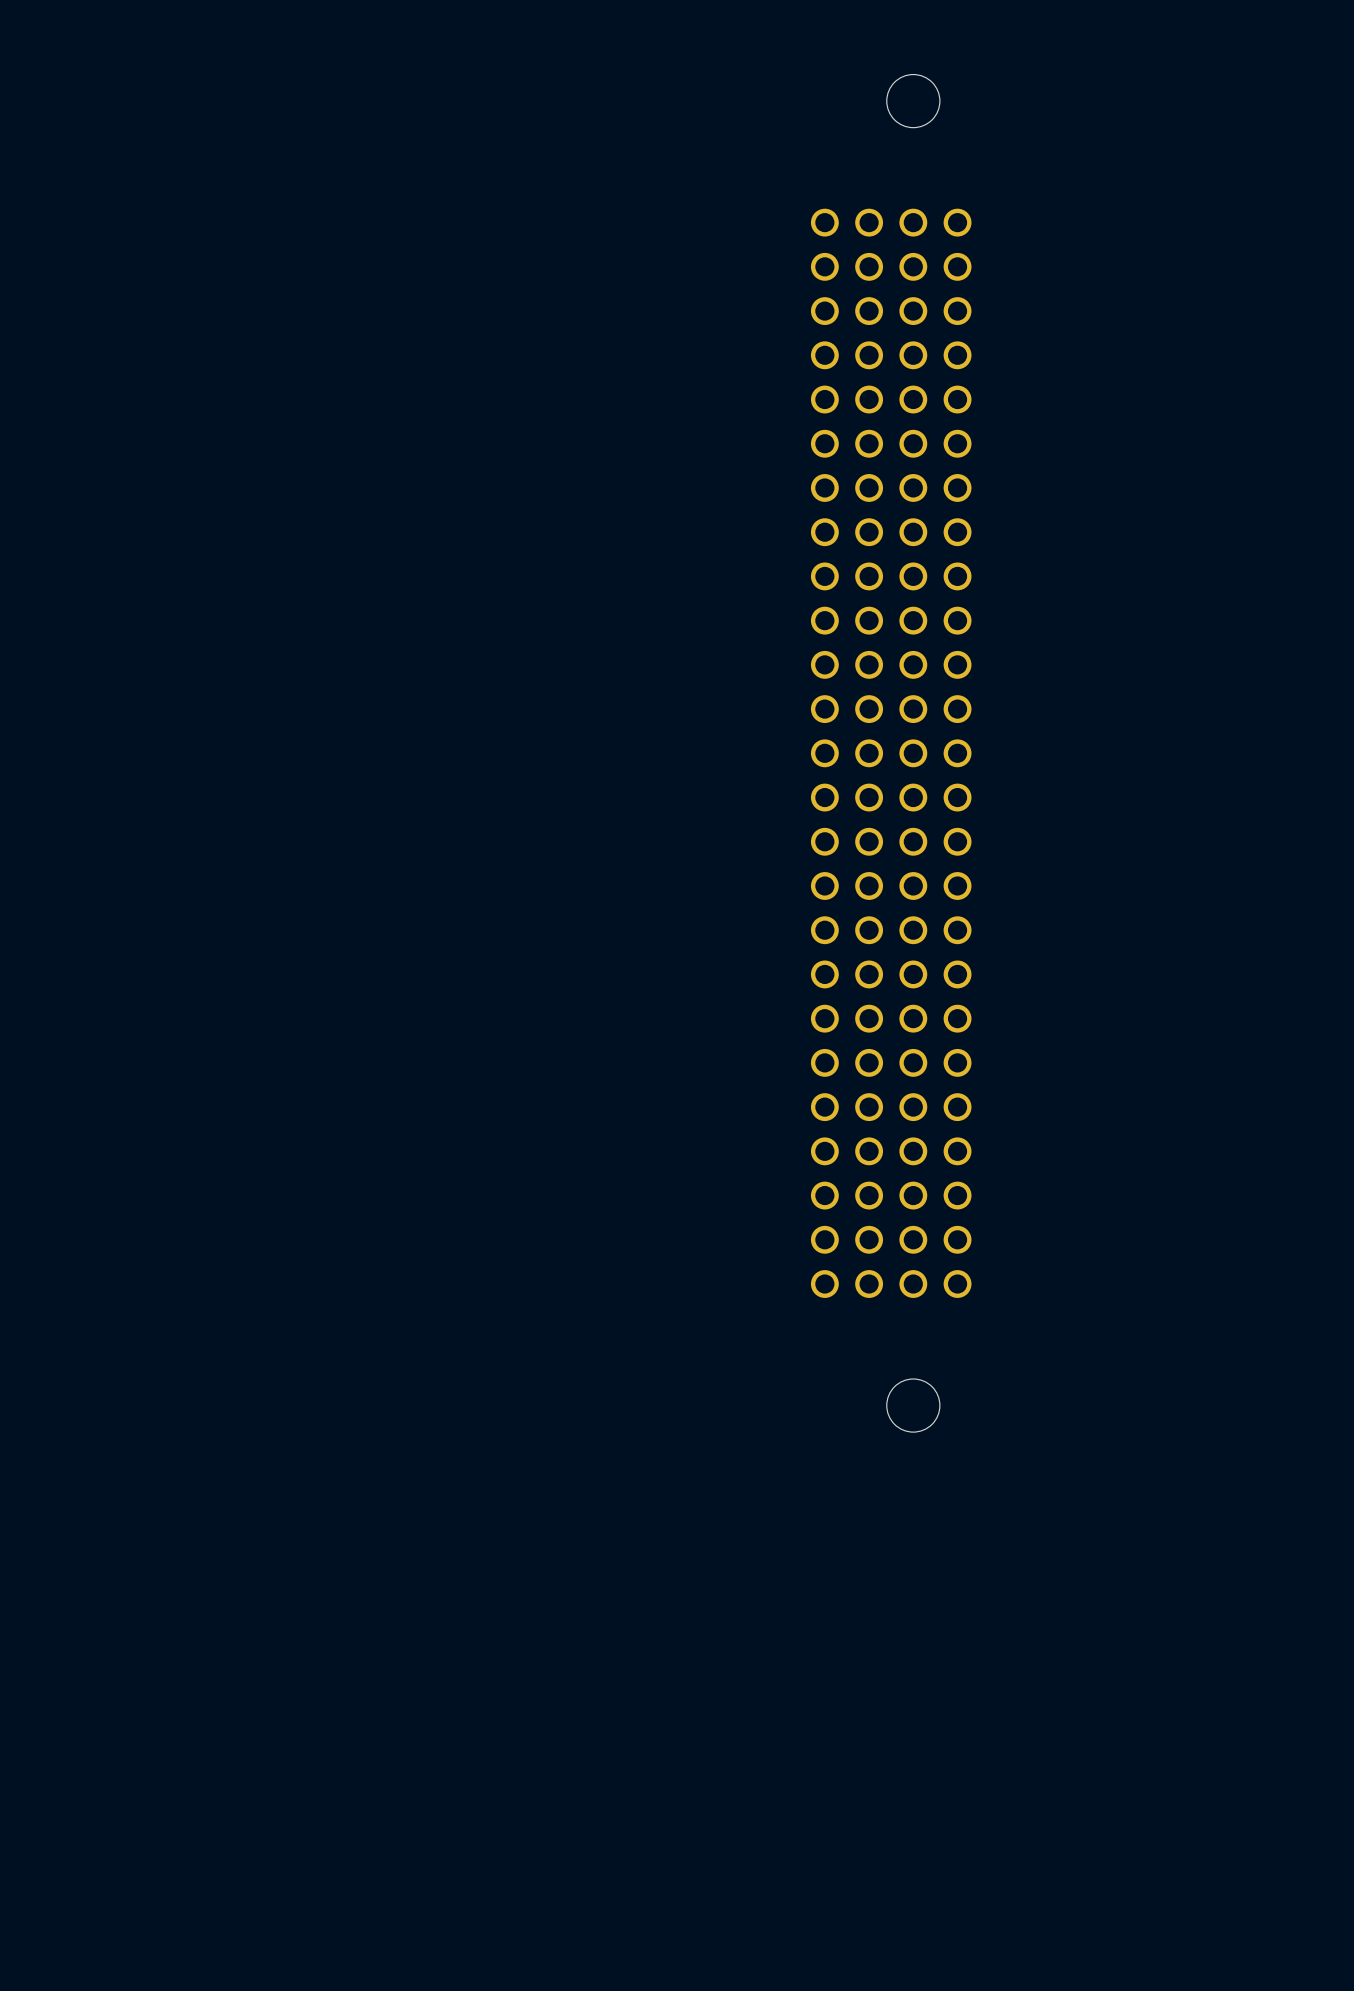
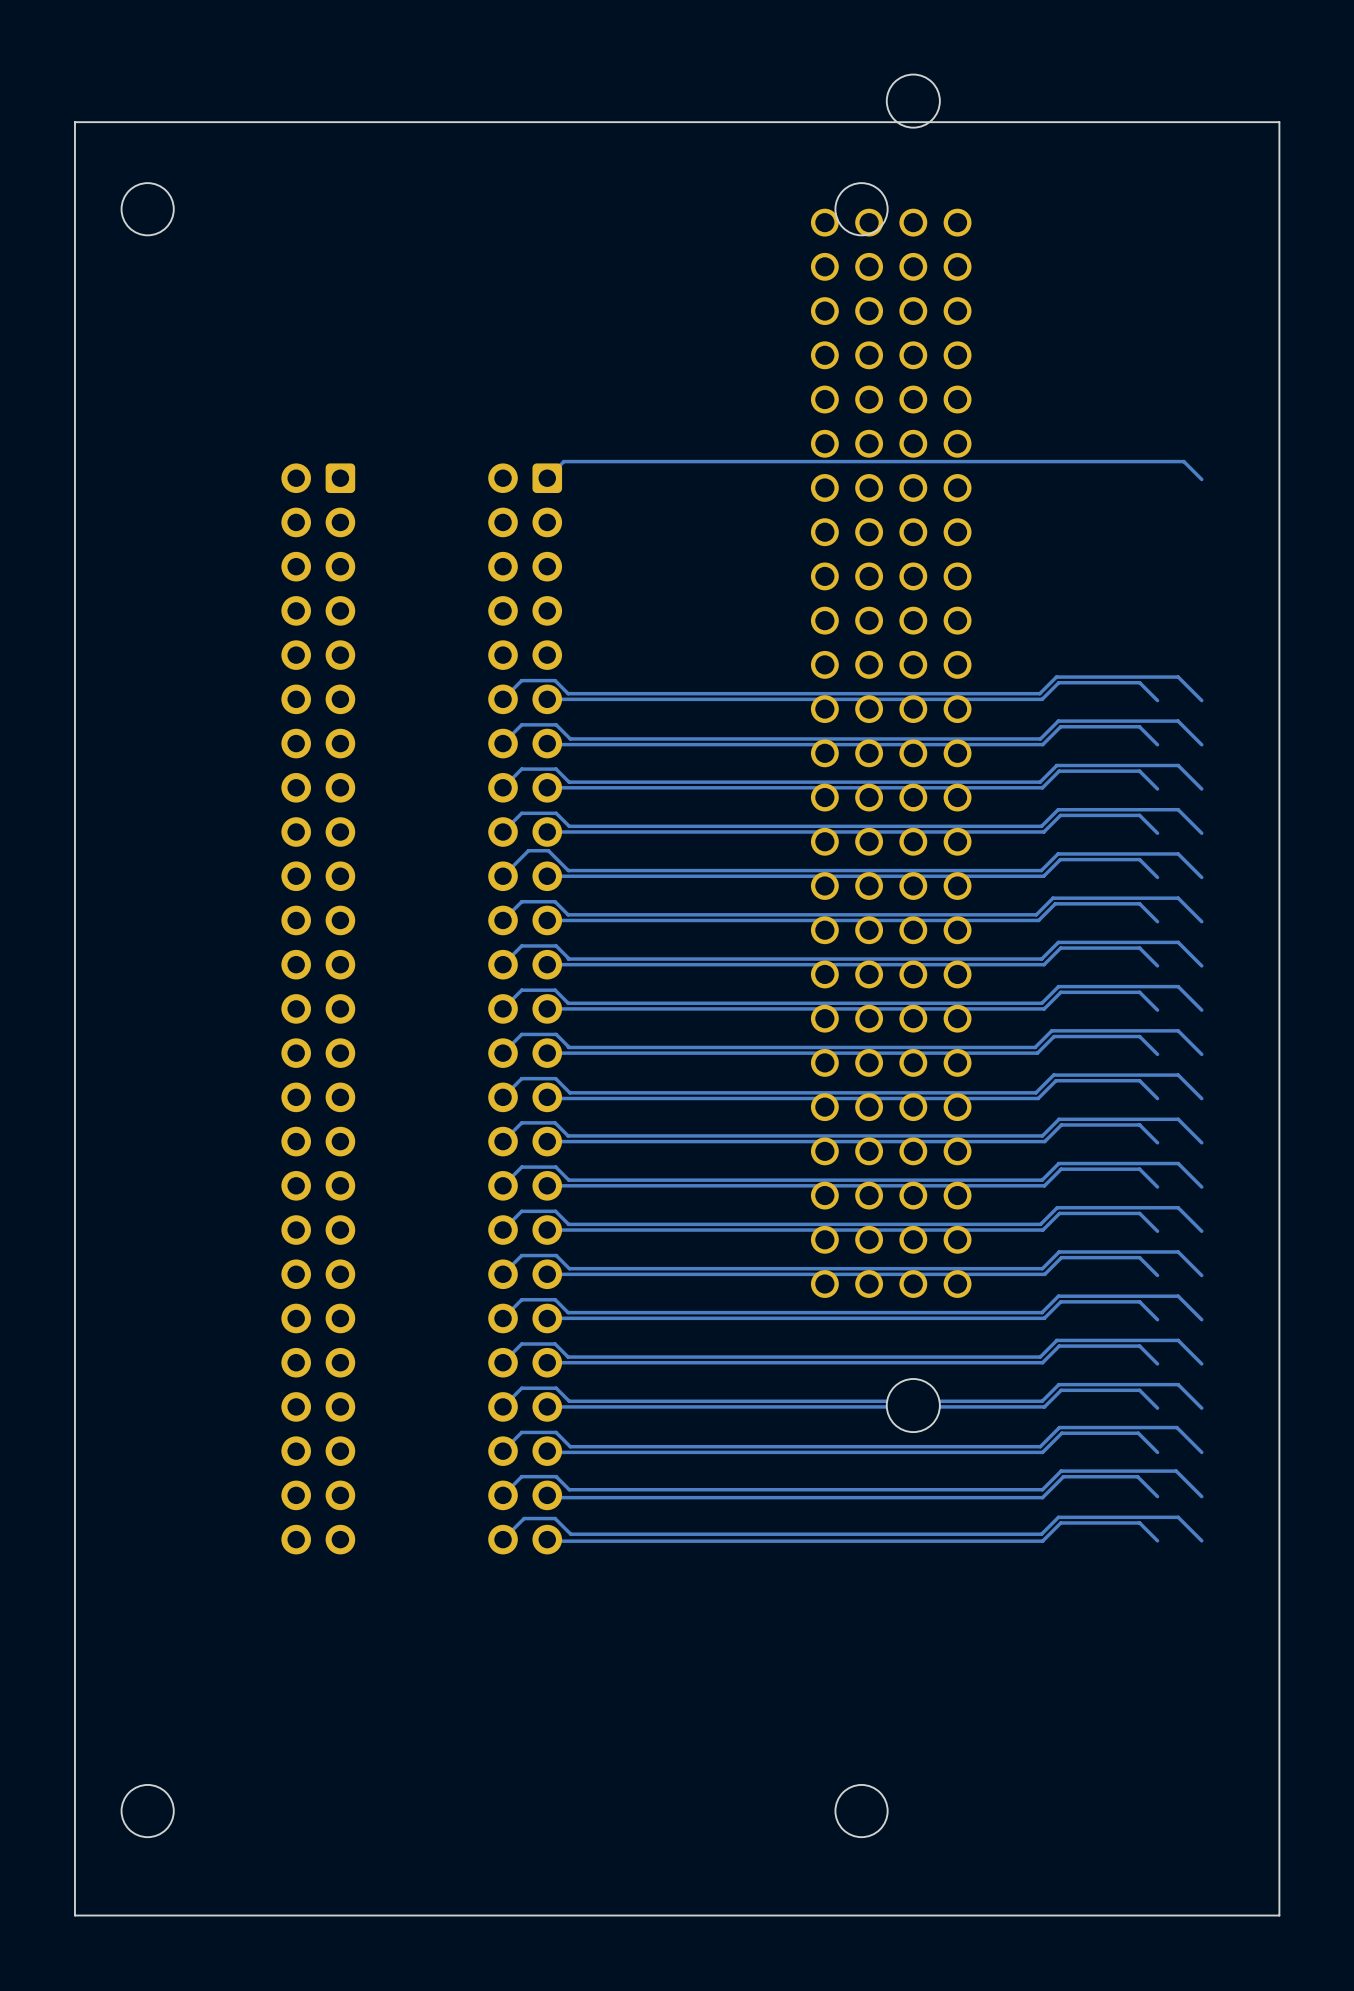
board edge: none -> (1279, 122) (1279, 1915) (74, 1915) (74, 122) (1279, 122)
round board edge: none -> [121, 182, 175, 236]
round board edge: none -> [834, 182, 889, 236]
track: none -> (547, 478) (563, 461) (1183, 461) (1201, 479)
track: none -> (503, 699) (521, 680) (555, 680) (568, 693) (1039, 693) (1056, 677) (1178, 677) (1201, 700)
track: none -> (547, 699) (1042, 699) (1058, 682) (1139, 682) (1157, 700)
track: none -> (503, 743) (521, 724) (556, 724) (570, 738) (1040, 738) (1058, 721) (1178, 721) (1201, 744)
track: none -> (547, 743) (1042, 744) (1060, 726) (1139, 726) (1157, 744)
track: none -> (503, 787) (521, 769) (556, 769) (569, 782) (1040, 782) (1056, 765) (1178, 765) (1201, 789)
track: none -> (547, 787) (1042, 787) (1059, 771) (1139, 771) (1157, 789)
track: none -> (547, 831) (1043, 831) (1060, 815) (1139, 815) (1157, 833)
track: none -> (503, 832) (521, 813) (556, 813) (569, 826) (1041, 826) (1058, 809) (1178, 809) (1201, 833)
track: none -> (503, 876) (528, 850) (548, 850) (568, 870) (1041, 870) (1058, 853) (1178, 853) (1201, 877)
track: none -> (547, 876) (1043, 876) (1060, 859) (1139, 859) (1157, 877)
track: none -> (503, 920) (521, 901) (555, 901) (568, 914) (1036, 914) (1052, 898) (1178, 898) (1201, 921)
track: none -> (547, 920) (1038, 920) (1055, 903) (1139, 903) (1157, 921)
track: none -> (503, 964) (521, 945) (556, 945) (568, 959) (1041, 959) (1058, 942) (1178, 942) (1201, 965)
track: none -> (547, 964) (1044, 964) (1060, 948) (1139, 948) (1157, 965)
part: none -> (318, 1008)
track: none -> (503, 1008) (521, 990) (555, 990) (568, 1003) (1041, 1003) (1058, 986) (1178, 986) (1201, 1010)
part: none -> (525, 1008)
track: none -> (547, 1008) (1044, 1008) (1060, 992) (1139, 992) (1157, 1010)
track: none -> (503, 1053) (521, 1034) (556, 1034) (568, 1047) (1035, 1047) (1051, 1030) (1178, 1030) (1201, 1054)
track: none -> (547, 1053) (1037, 1053) (1054, 1036) (1139, 1036) (1157, 1054)
track: none -> (503, 1097) (521, 1078) (555, 1078) (569, 1092) (1035, 1092) (1053, 1075) (1178, 1075) (1201, 1098)
track: none -> (547, 1097) (1038, 1098) (1056, 1080) (1139, 1080) (1157, 1098)
track: none -> (503, 1141) (521, 1122) (555, 1122) (568, 1135) (1042, 1135) (1059, 1119) (1178, 1119) (1201, 1142)
track: none -> (547, 1141) (1044, 1141) (1061, 1124) (1139, 1124) (1157, 1142)
track: none -> (503, 1185) (521, 1167) (555, 1167) (568, 1180) (1042, 1180) (1058, 1163) (1178, 1163) (1201, 1187)
track: none -> (547, 1185) (1044, 1185) (1061, 1169) (1139, 1169) (1157, 1187)
track: none -> (503, 1230) (521, 1211) (555, 1211) (568, 1224) (1040, 1224) (1057, 1207) (1178, 1207) (1201, 1231)
track: none -> (547, 1230) (1042, 1230) (1059, 1213) (1139, 1213) (1157, 1231)
track: none -> (503, 1274) (521, 1255) (556, 1255) (569, 1268) (1042, 1268) (1059, 1251) (1178, 1251) (1201, 1275)
track: none -> (547, 1274) (1044, 1274) (1061, 1257) (1139, 1257) (1157, 1275)
track: none -> (503, 1318) (521, 1299) (555, 1299) (568, 1312) (1042, 1312) (1058, 1296) (1178, 1296) (1201, 1319)
track: none -> (547, 1318) (1044, 1318) (1060, 1301) (1139, 1301) (1157, 1319)
track: none -> (503, 1362) (521, 1343) (555, 1343) (568, 1357) (1040, 1357) (1056, 1340) (1178, 1340) (1201, 1363)
track: none -> (547, 1362) (1042, 1362) (1059, 1346) (1139, 1346) (1157, 1363)
track: none -> (503, 1406) (521, 1388) (556, 1388) (569, 1401) (1042, 1401) (1058, 1384) (1178, 1384) (1201, 1408)
track: none -> (547, 1406) (1044, 1406) (1061, 1390) (1139, 1390) (1157, 1408)
track: none -> (503, 1451) (521, 1432) (556, 1432) (570, 1446) (1040, 1446) (1059, 1427) (1176, 1427) (1201, 1452)
track: none -> (547, 1451) (1042, 1452) (1061, 1433) (1138, 1433) (1157, 1452)
track: none -> (503, 1495) (521, 1476) (556, 1476) (569, 1489) (1042, 1489) (1061, 1471) (1176, 1471) (1201, 1496)
track: none -> (547, 1495) (549, 1497) (1042, 1497) (1063, 1476) (1137, 1476) (1157, 1496)
track: none -> (503, 1539) (524, 1518) (555, 1518) (570, 1534) (1041, 1534) (1058, 1517) (1178, 1517) (1201, 1540)
track: none -> (547, 1539) (548, 1541) (1042, 1541) (1060, 1522) (1139, 1522) (1157, 1540)
round board edge: none -> [121, 1784, 175, 1838]
round board edge: none -> [834, 1784, 889, 1838]

